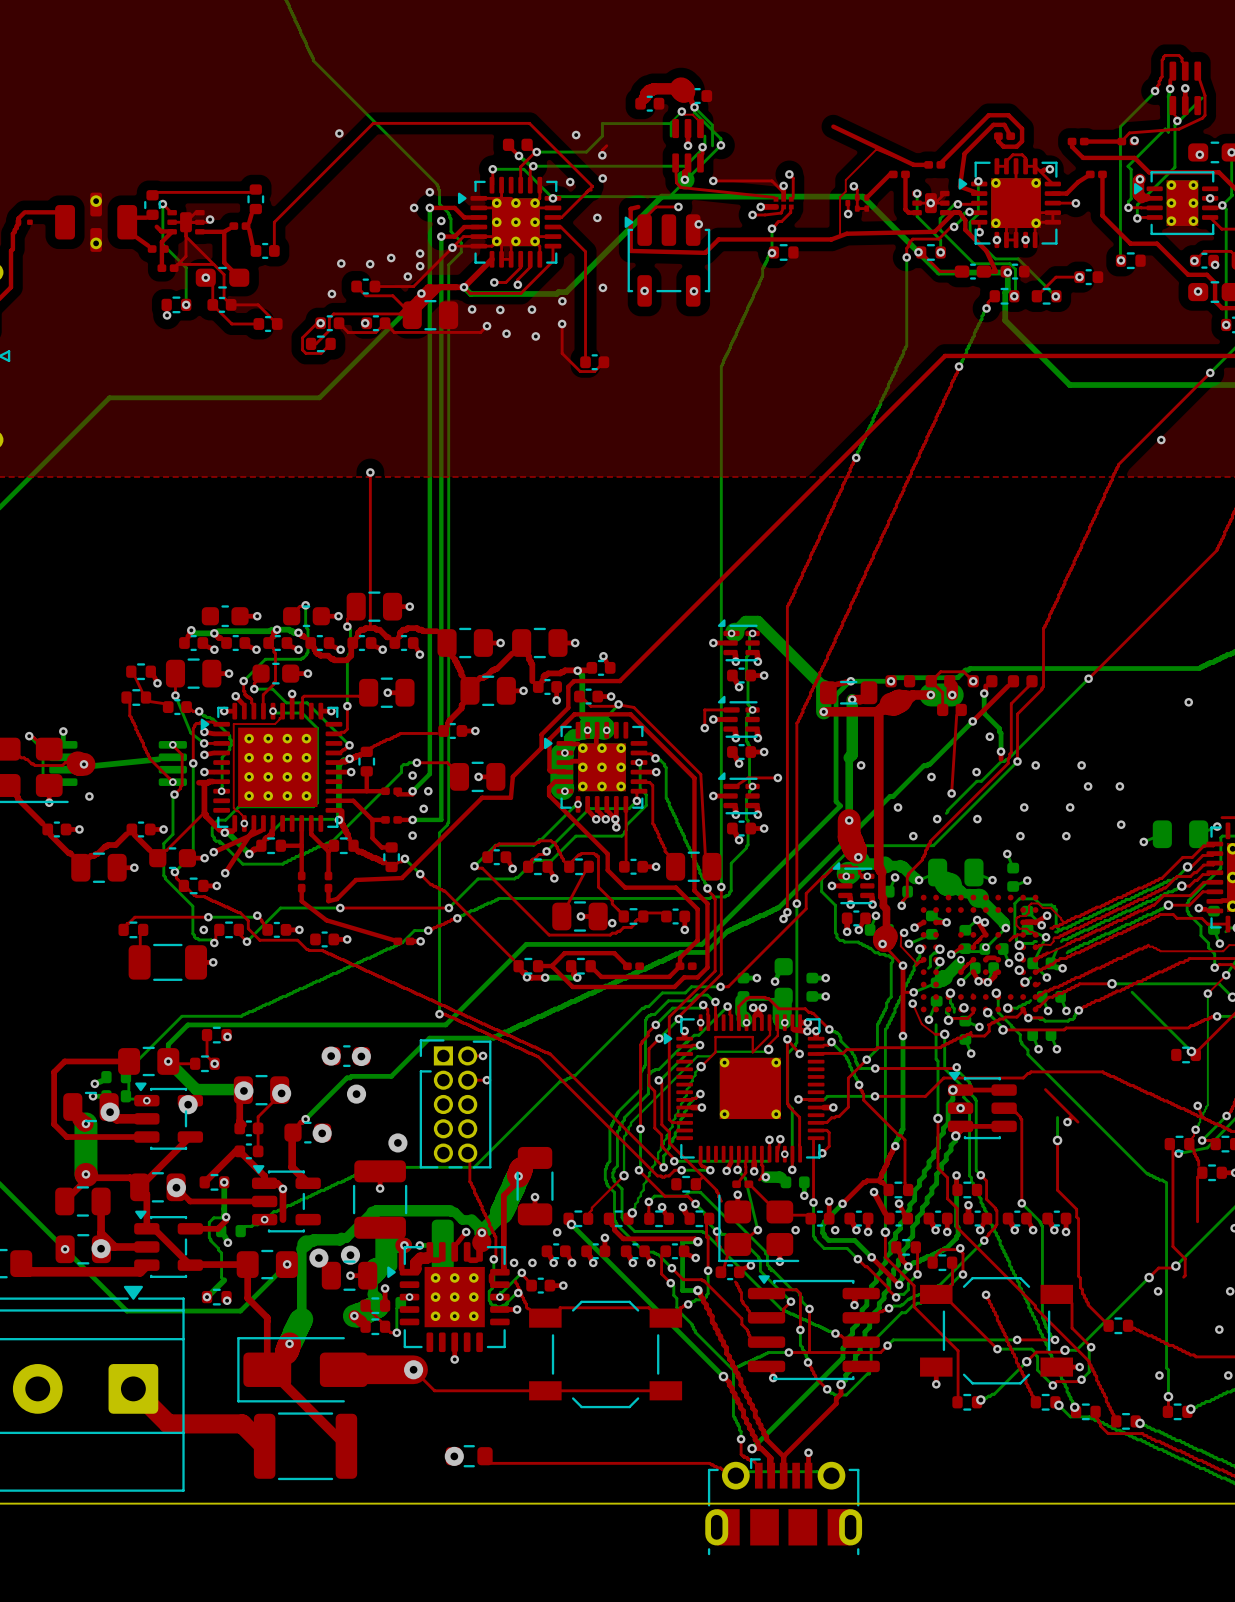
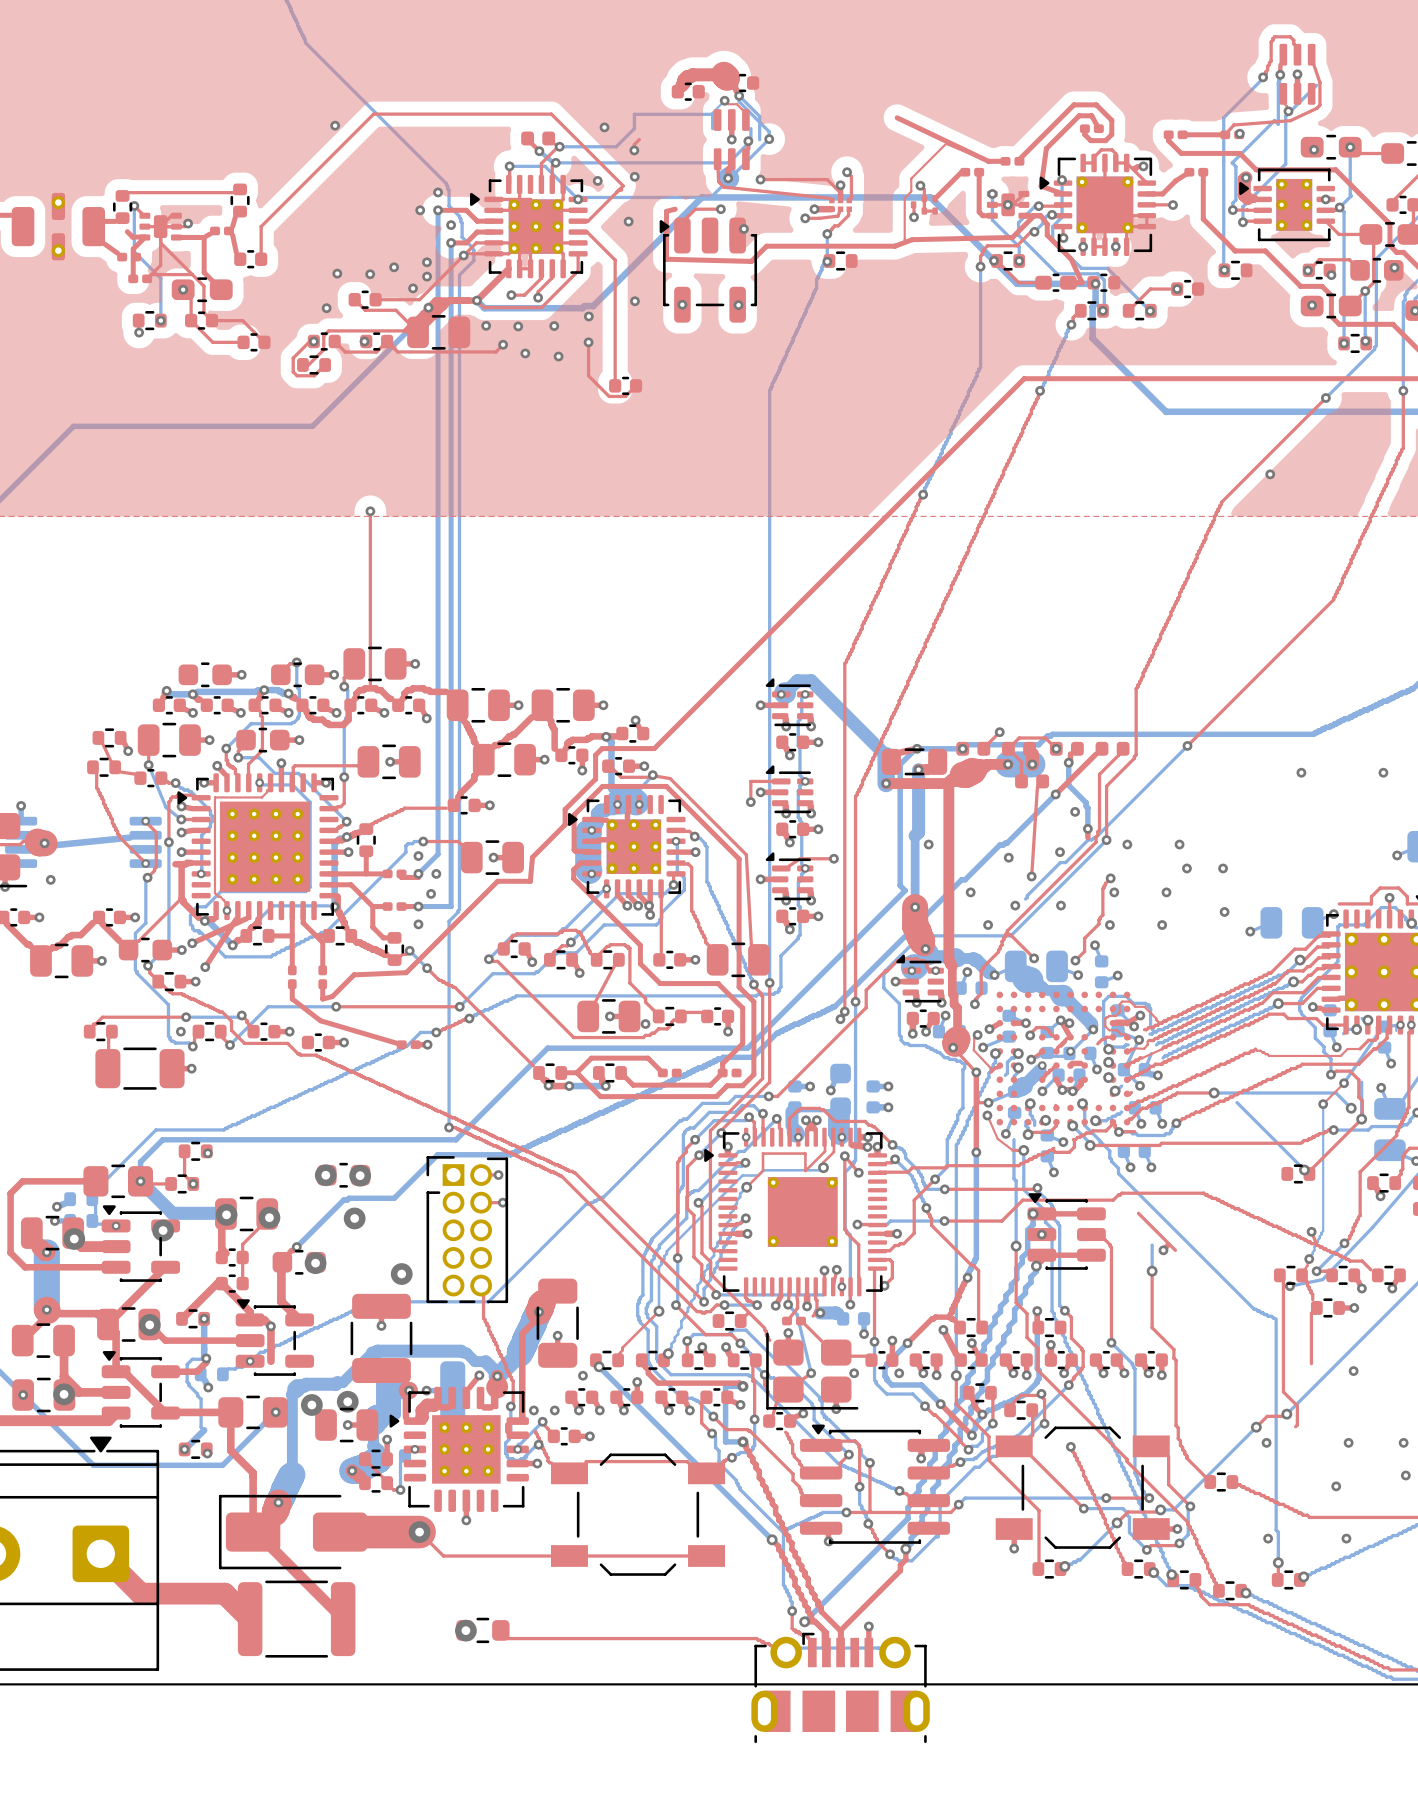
top track: none -> (999, 732) (988, 743)
via: none -> (999, 732)
top track: none -> (1110, 878) (1102, 888) (1102, 914) (1098, 920) (1098, 924) (1084, 938) (1084, 951) (1075, 960)
via: none -> (1110, 878)
top track: none -> (1008, 933) (1034, 958)
via: none -> (1034, 958)
via: none -> (1075, 960)
top track: none -> (1030, 1035) (1036, 1027) (1044, 1027) (1053, 1036)
via: none -> (1030, 1035)

